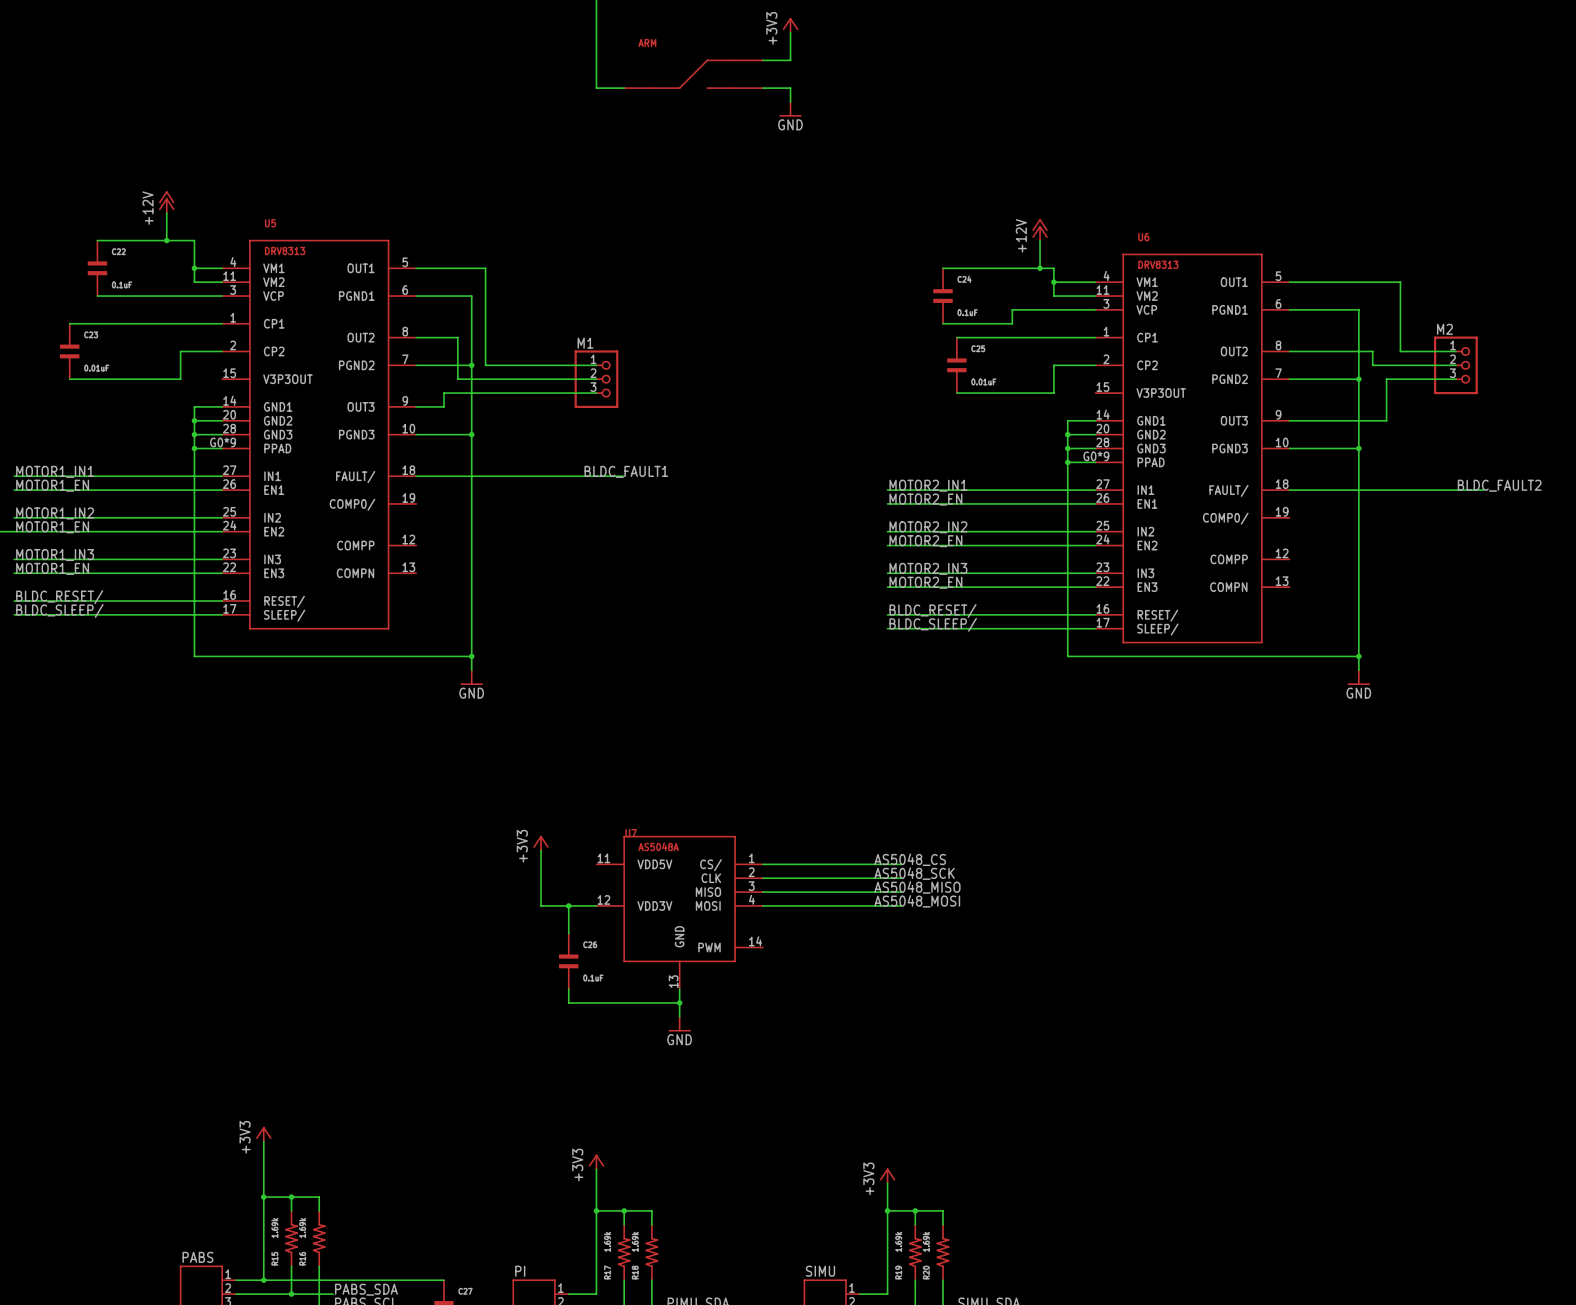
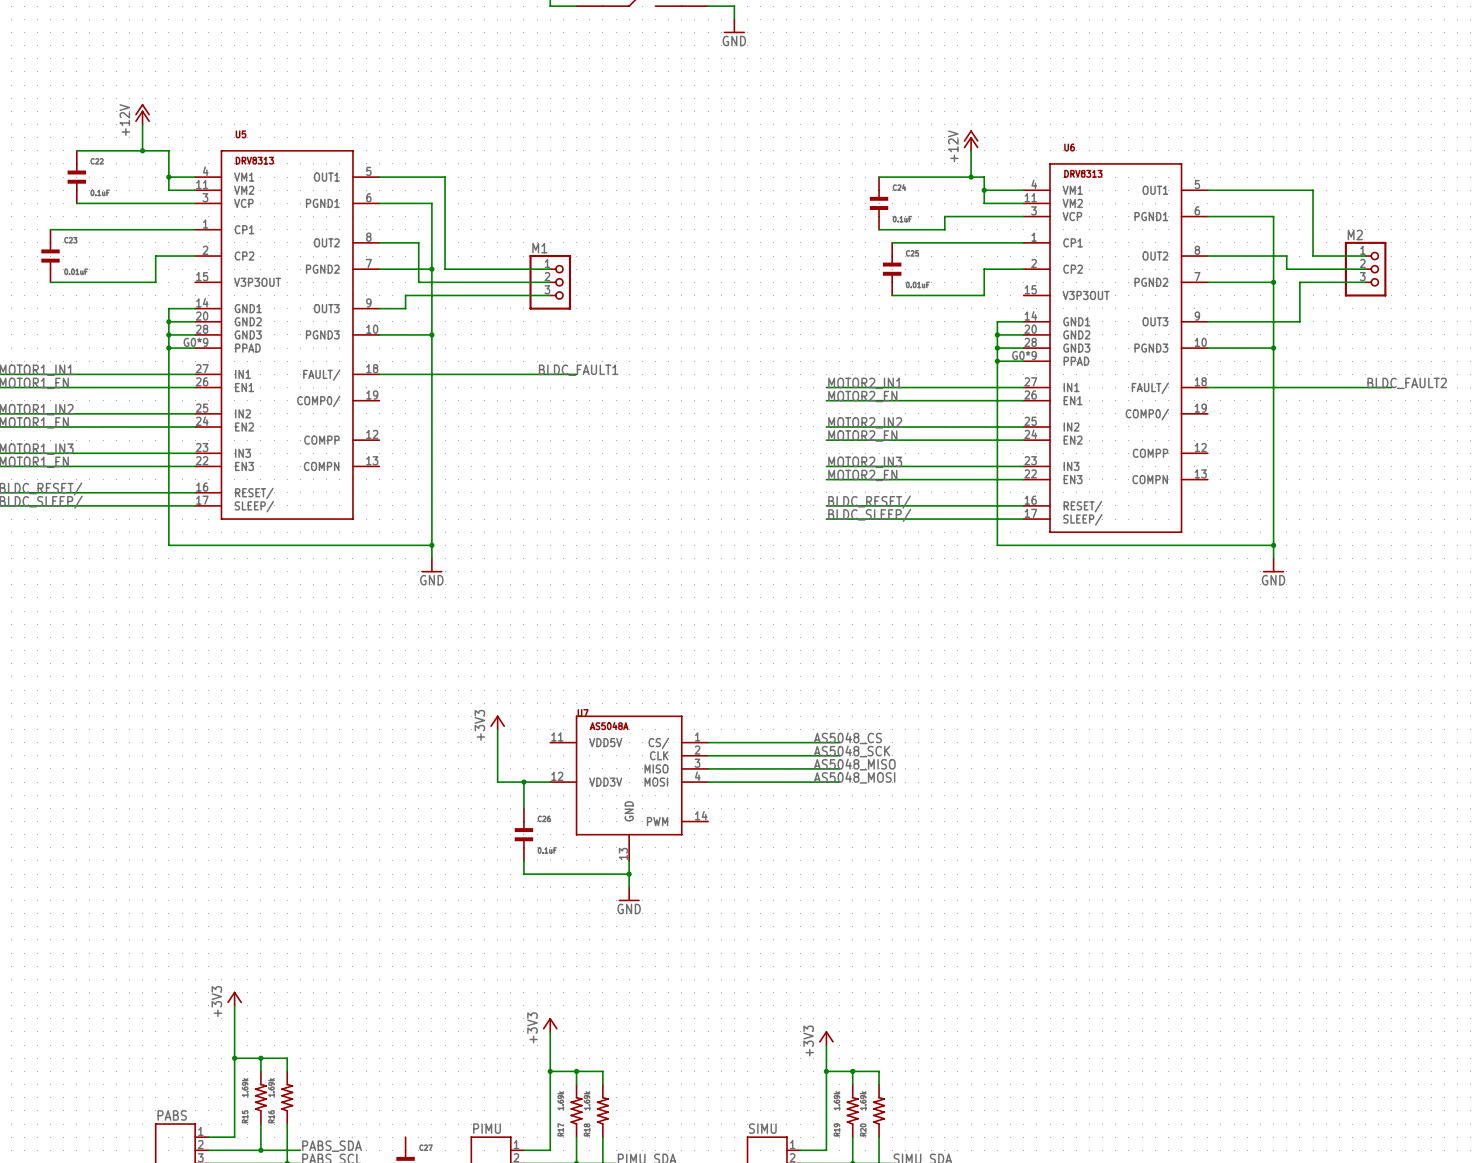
PI name: PI (520, 1271) -> PIMU (487, 1128)
wire: (263, 1280) (443, 1280) -> none
junction: (263, 1280) -> none

